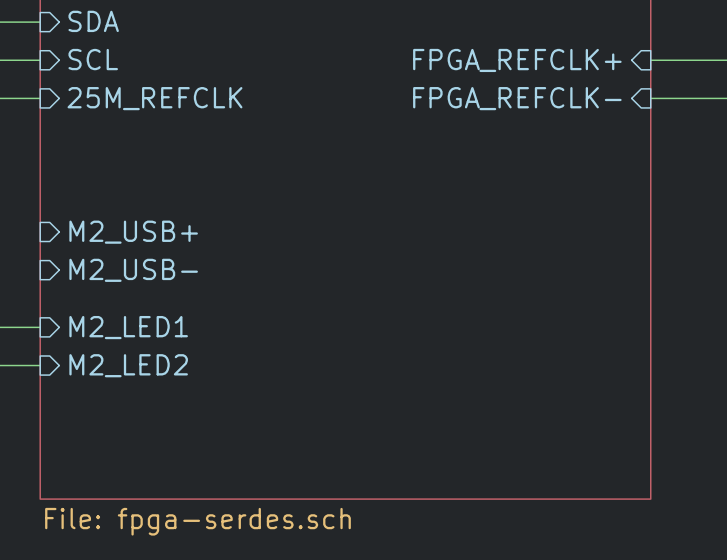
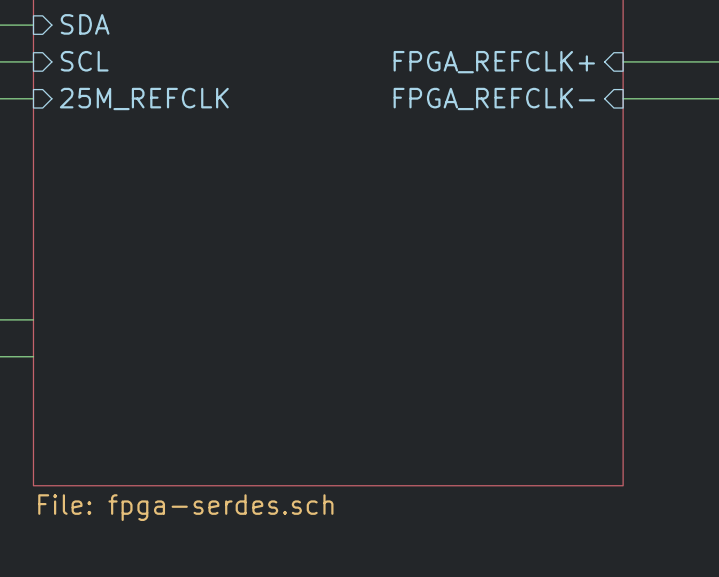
sheet pin: M2_USB+ (133, 232) -> none
sheet pin: M2_USB- (133, 270) -> none
sheet pin: M2_LED1 (128, 327) -> none
sheet pin: M2_LED2 (128, 365) -> none

